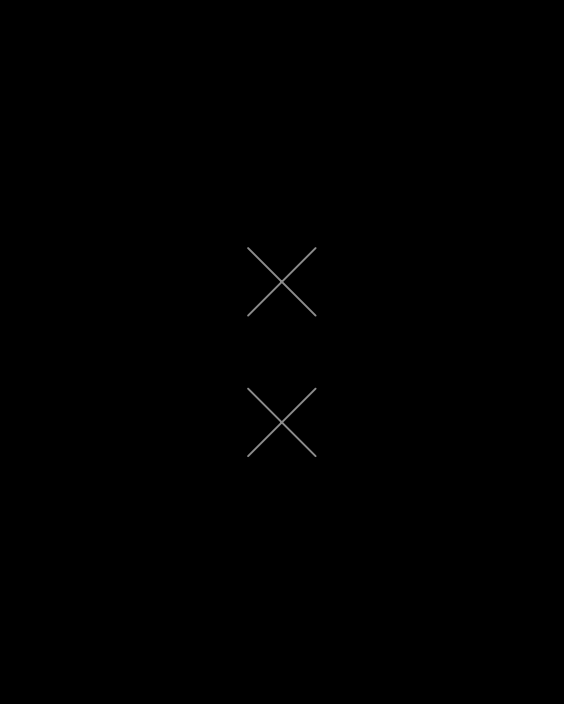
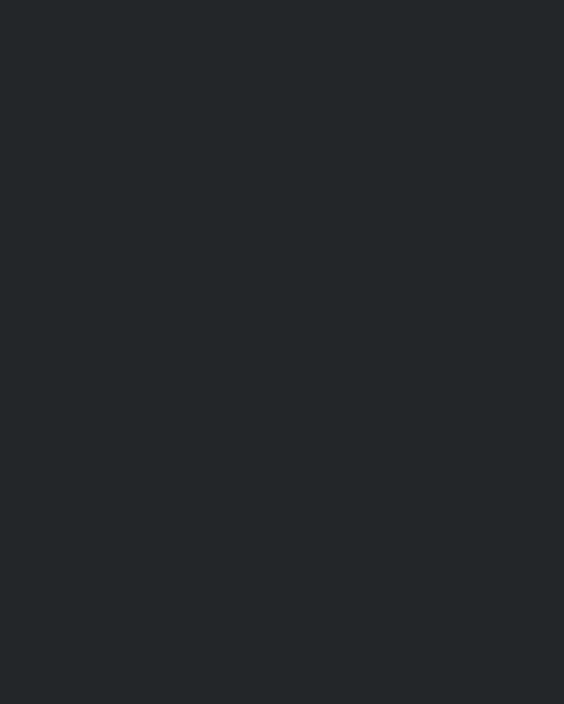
no-connect mark: (281, 281) -> none
no-connect mark: (281, 422) -> none

